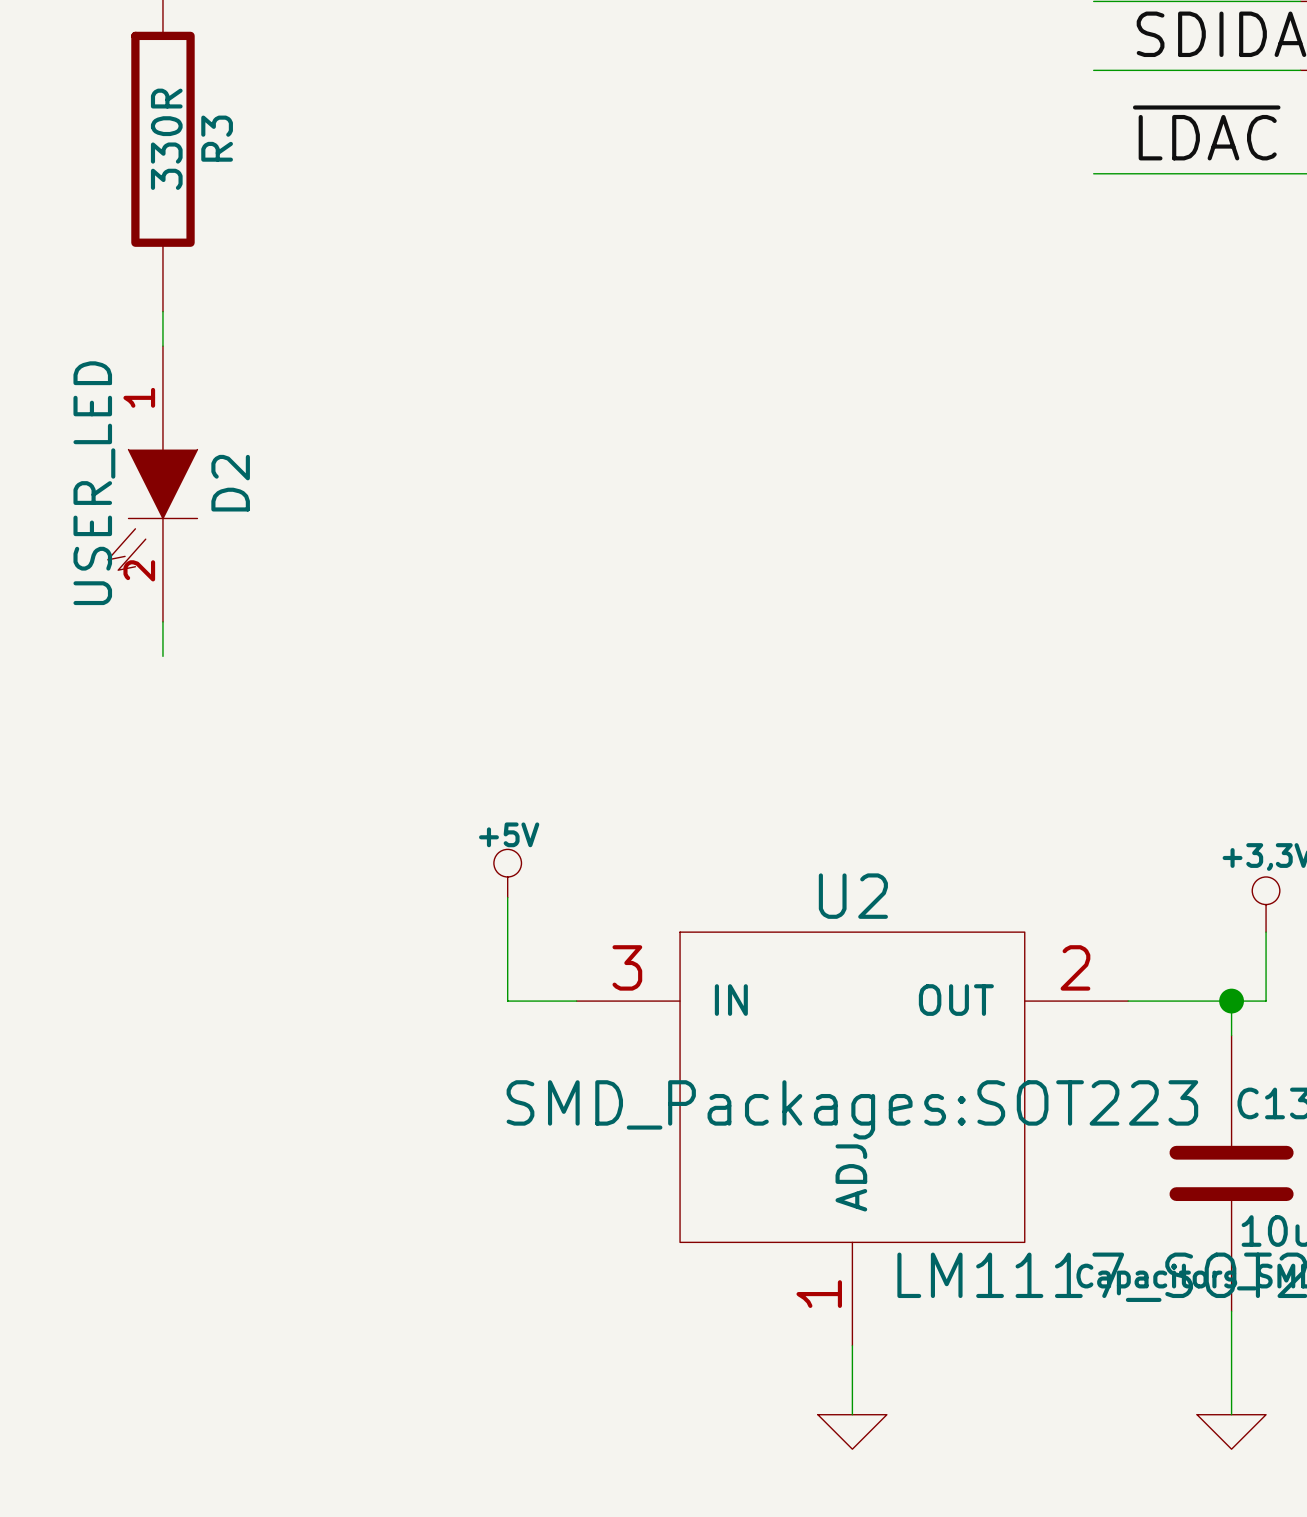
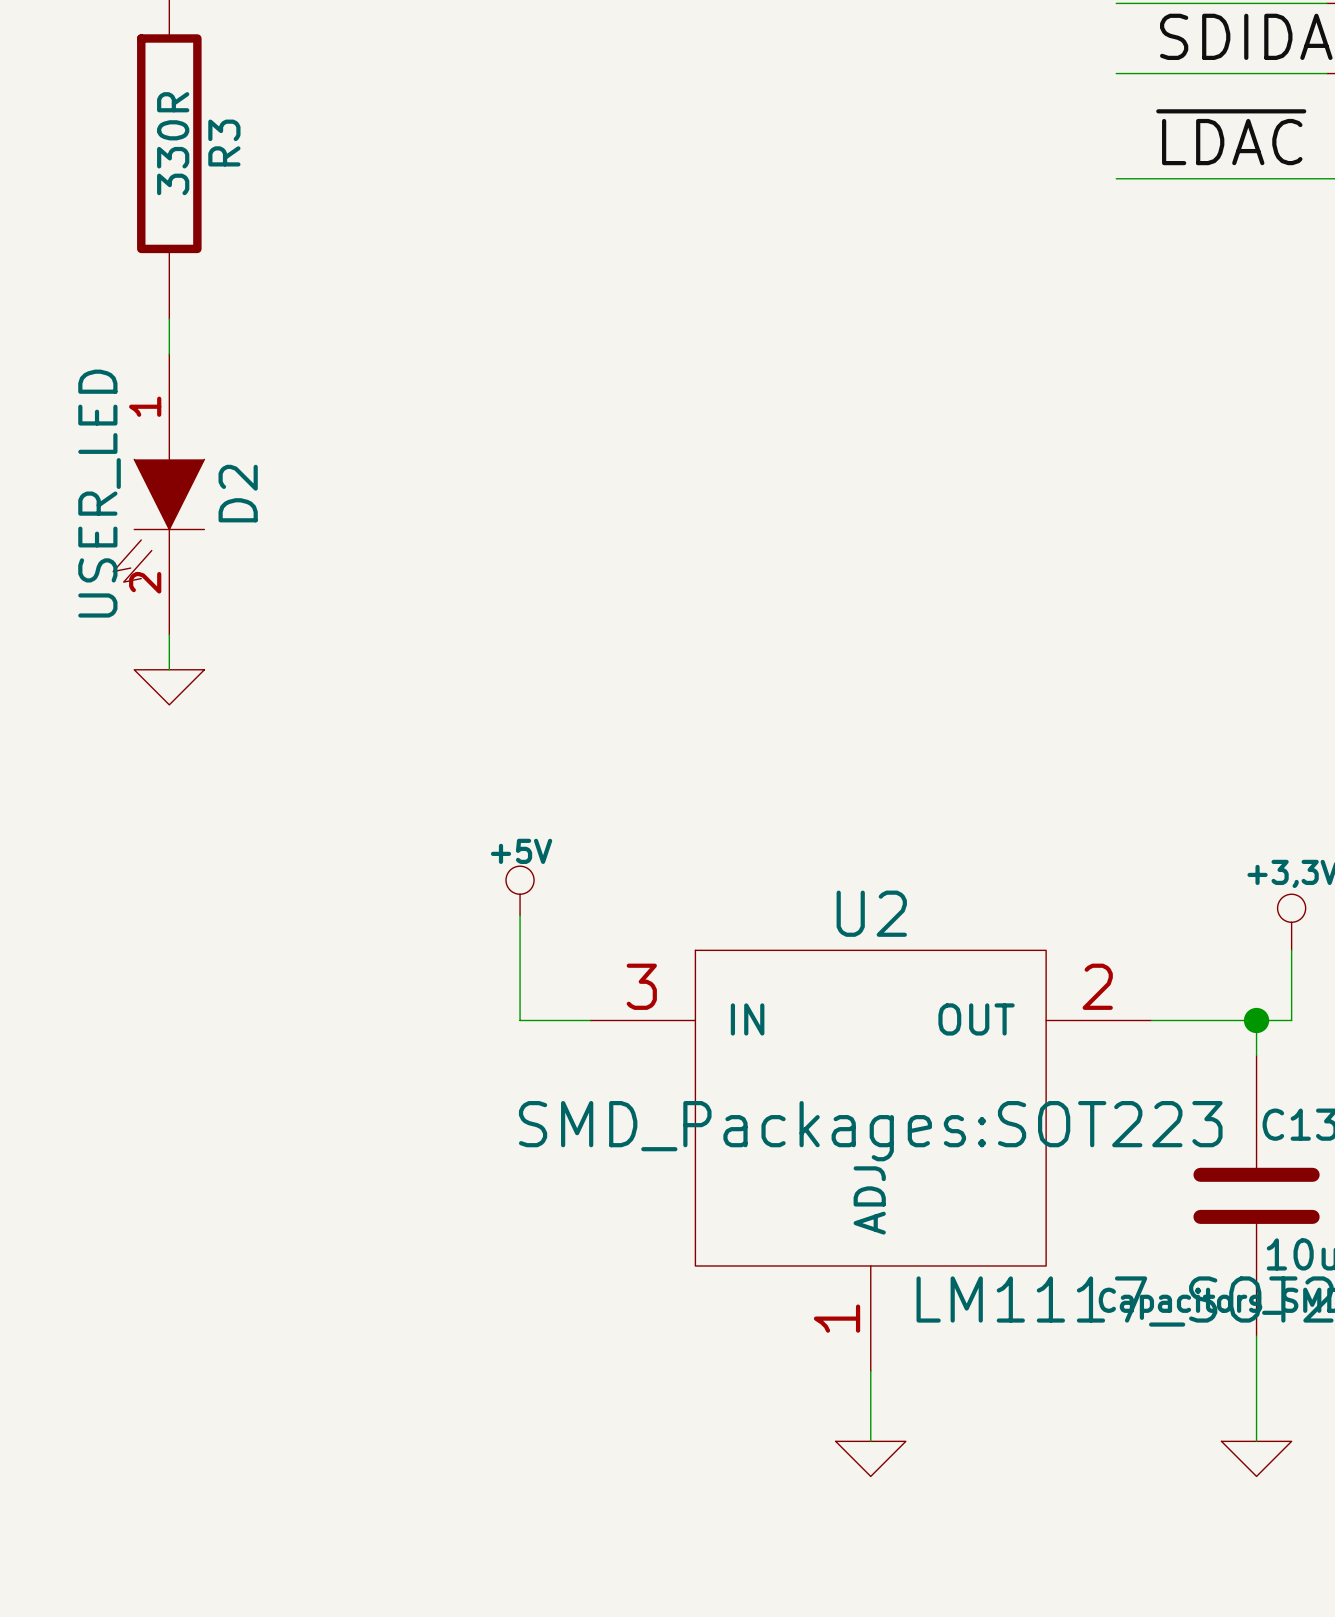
power symbol: none -> (169, 687)

